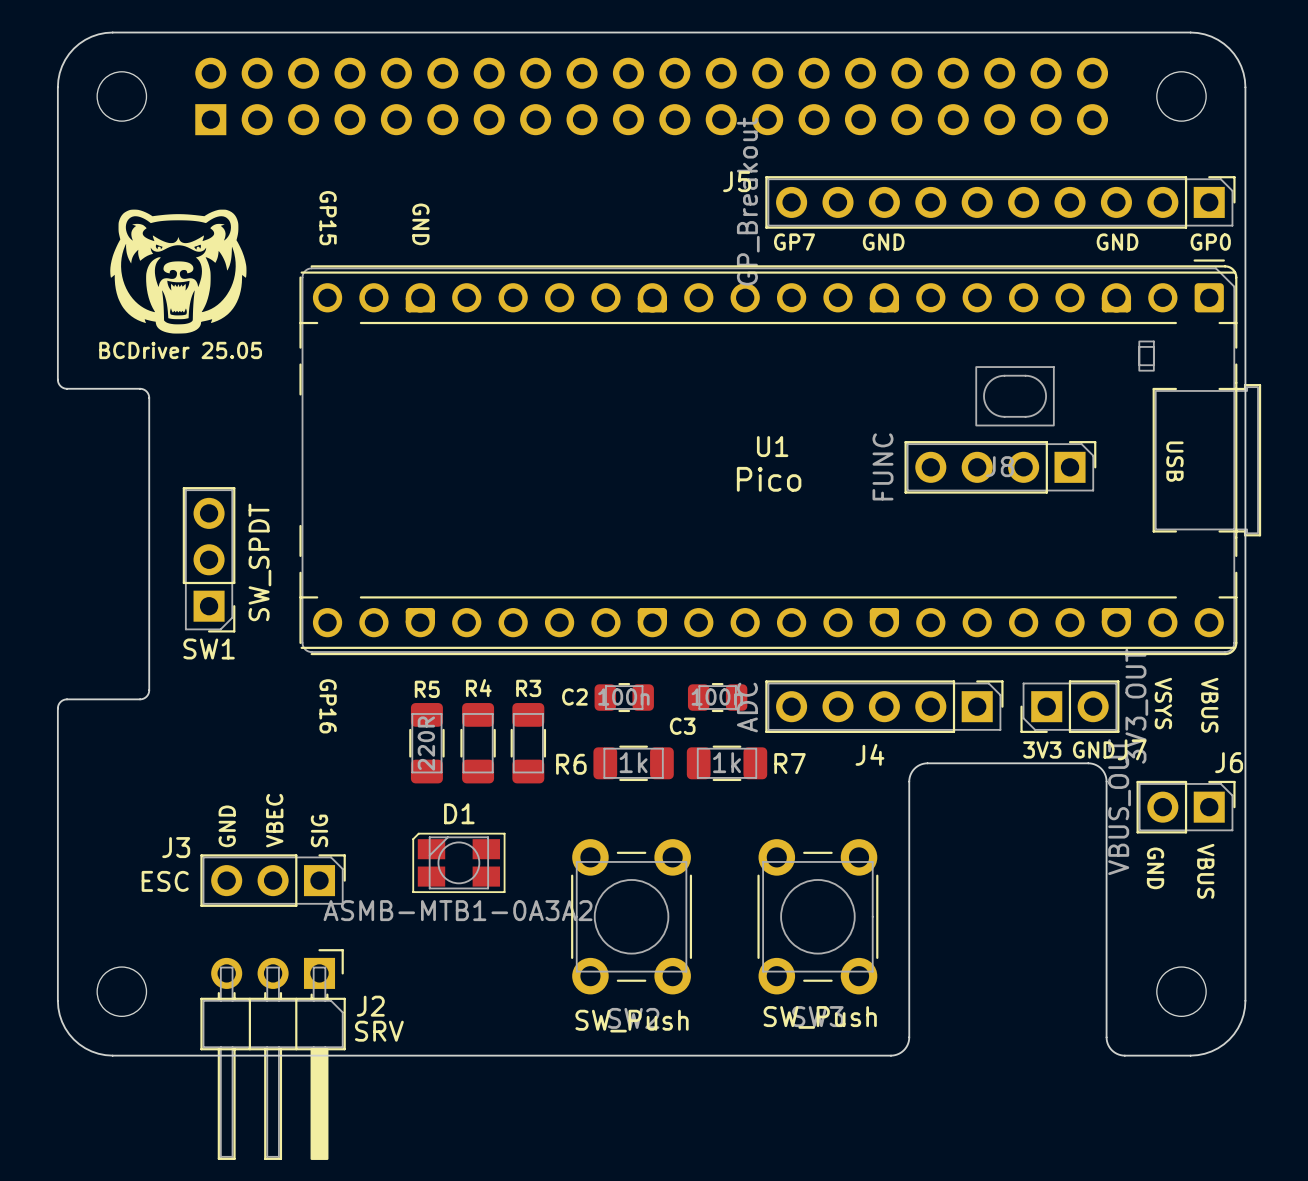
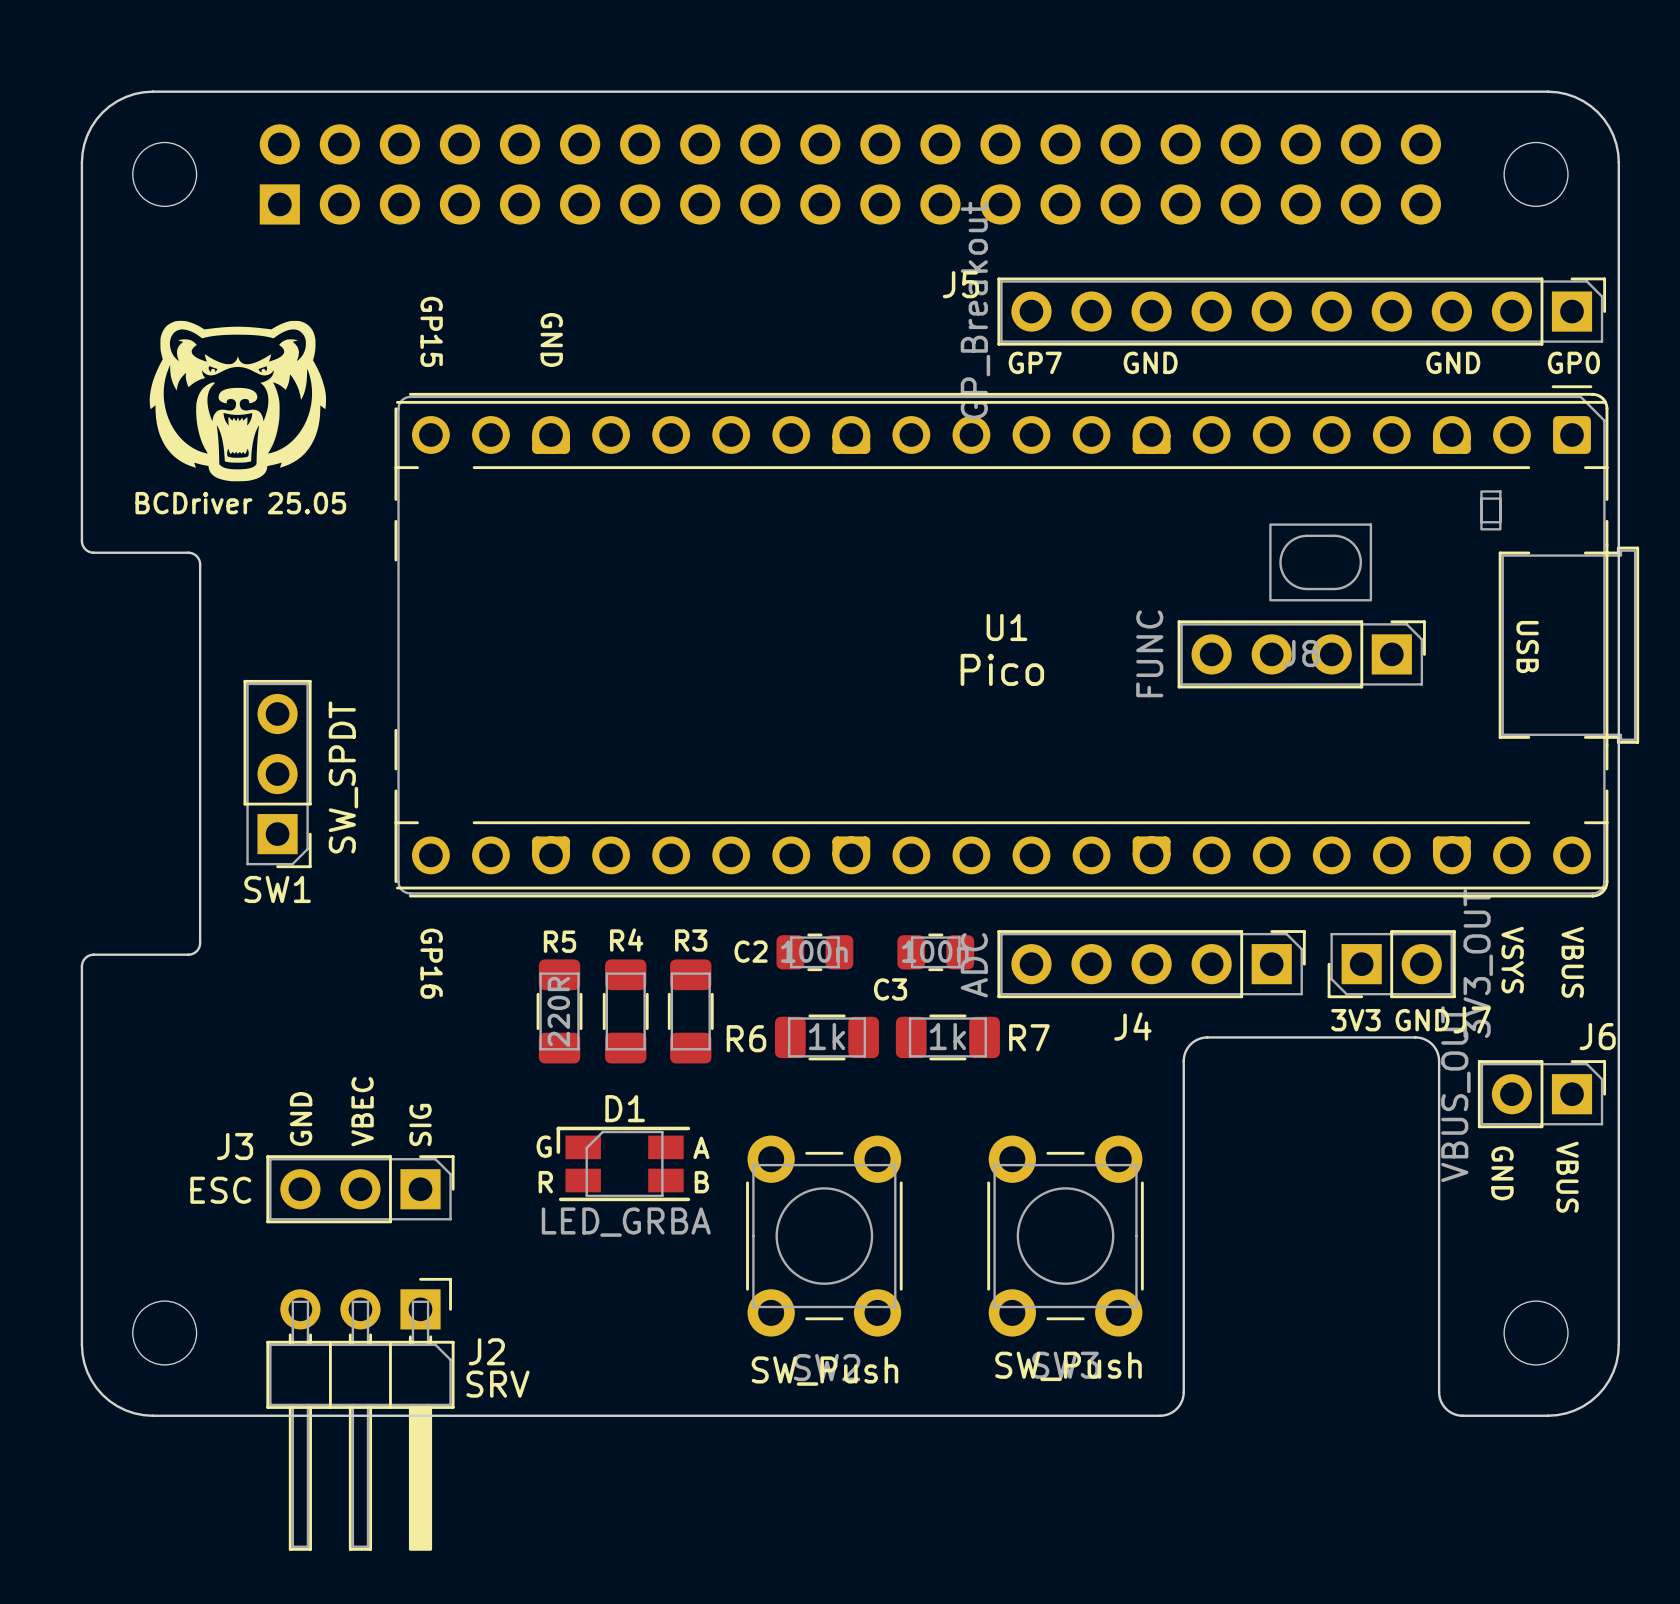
D1 footprint: [412, 832, 506, 894] -> [556, 1126, 691, 1202]
text: none -> G (544, 1146)
text: none -> A (701, 1147)
text: none -> R (545, 1182)
text: none -> B (701, 1182)
D1 value: ASMB-MTB1-0A3A2 (458, 910) -> LED_GRBA (626, 1222)

